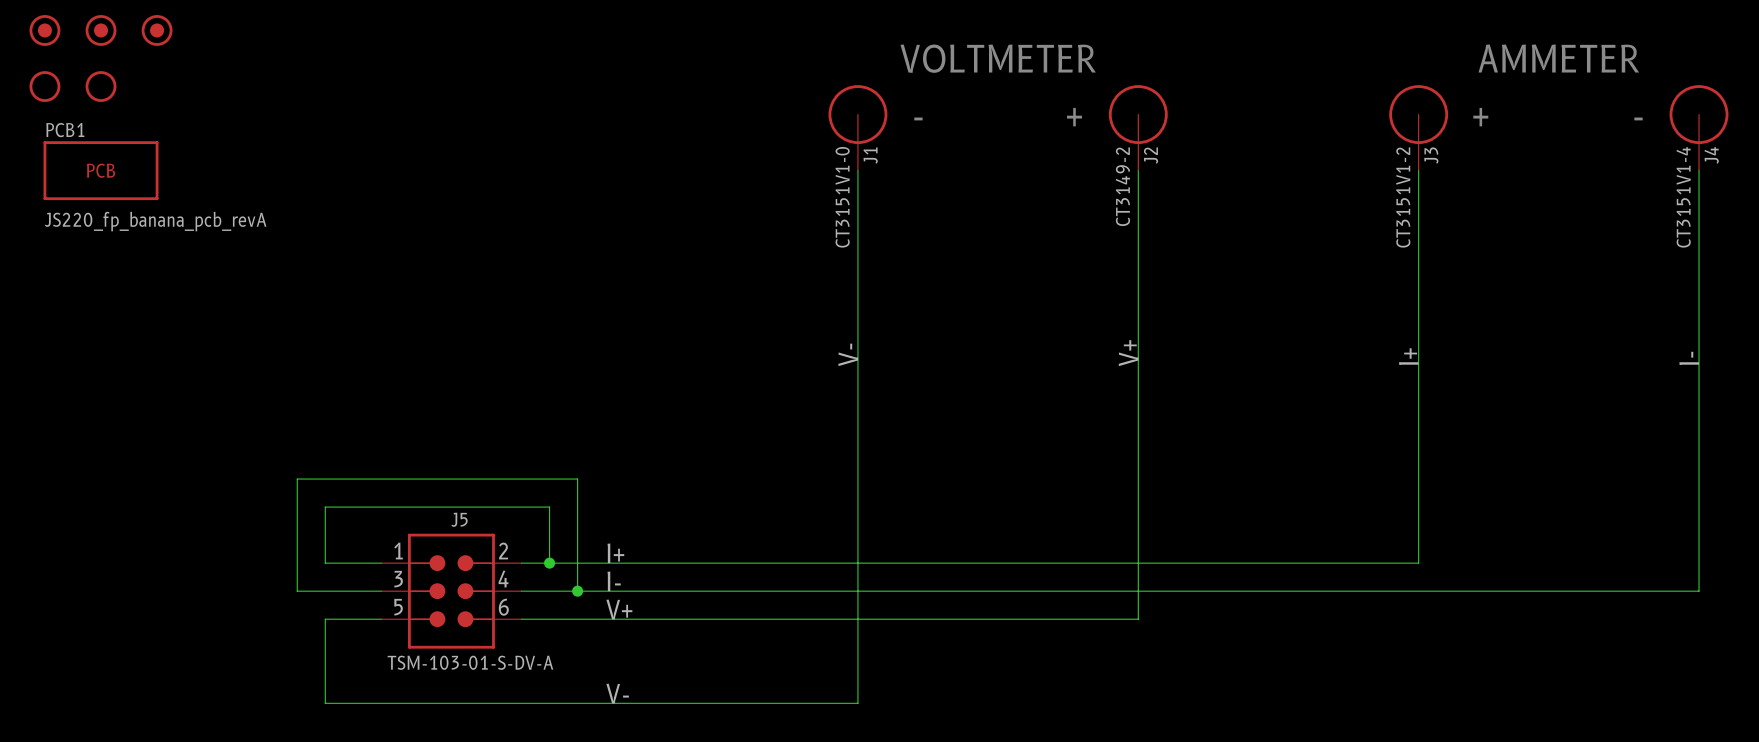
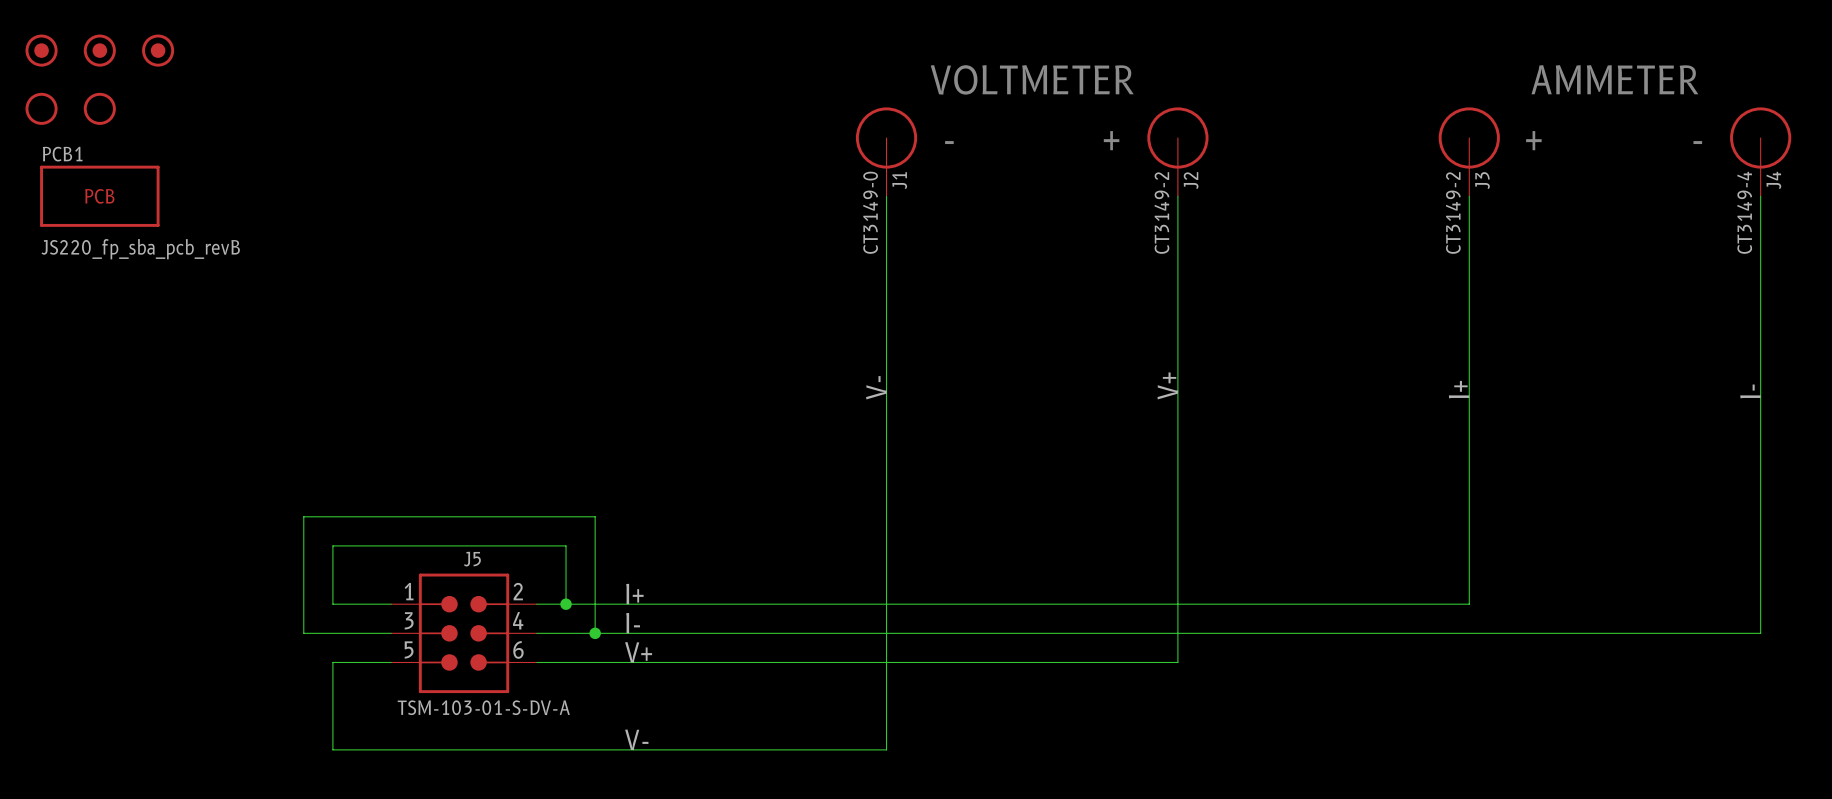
J1 value: CT3151V1-0 (842, 197) -> CT3149-0 (870, 212)
J3 value: CT3151V1-2 (1403, 197) -> CT3149-2 (1453, 212)
J4 value: CT3151V1-4 (1683, 197) -> CT3149-4 (1744, 212)
PCB1 value: JS220_fp_banana_pcb_revA (155, 221) -> JS220_fp_sba_pcb_revB (140, 249)

